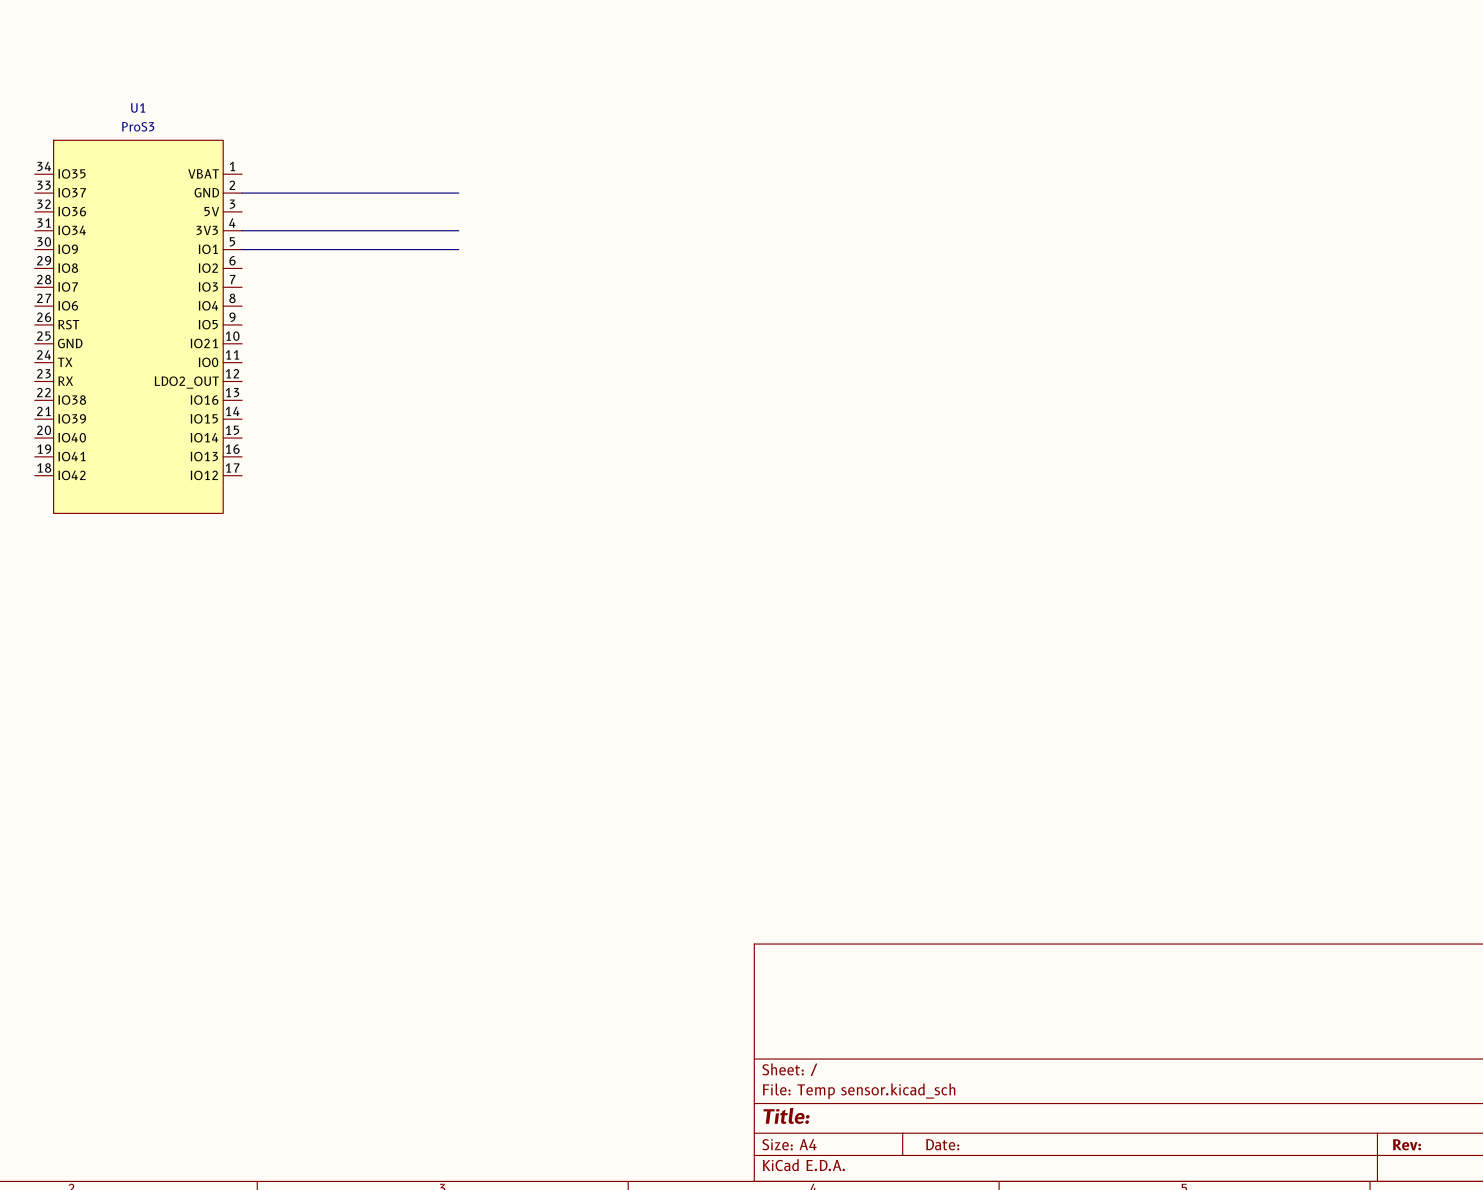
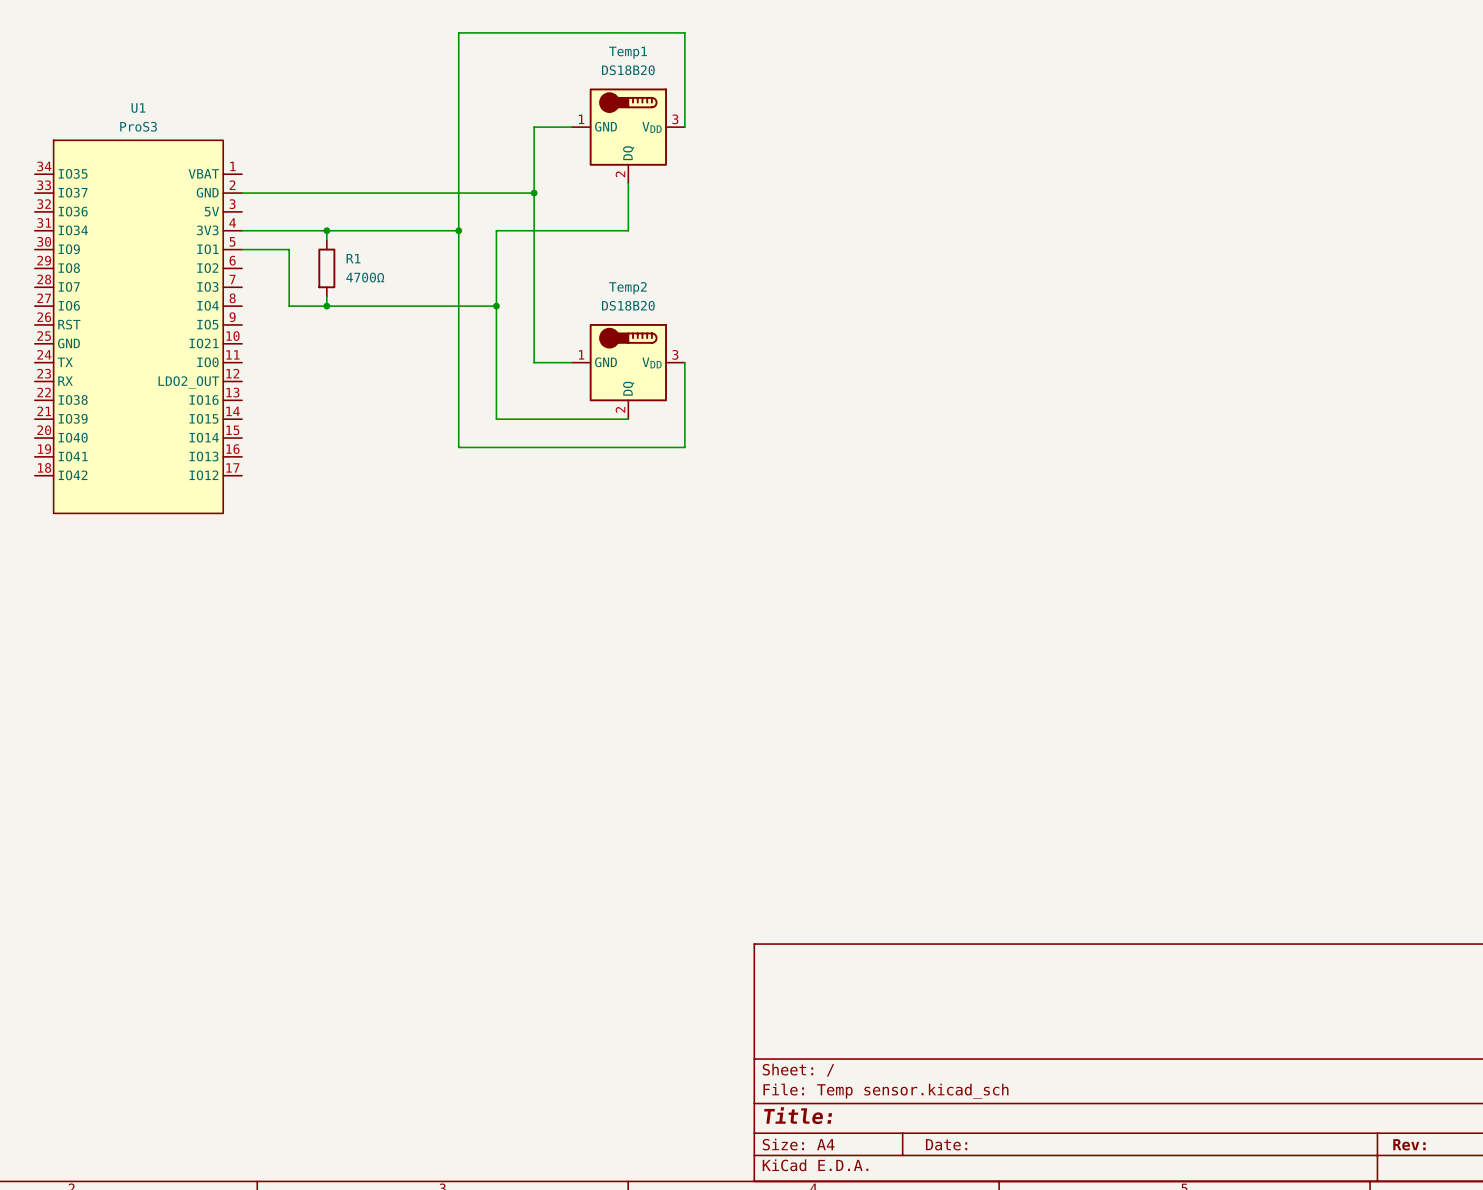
wire: none -> (571, 127) (534, 127) (534, 362) (571, 362)
wire: none -> (684, 127) (684, 32) (458, 32) (458, 447) (684, 447) (684, 362)
Temp1: none -> DS18B20 (628, 136)
wire: none -> (628, 183) (628, 230) (496, 230) (496, 419) (628, 419)
wire: none -> (458, 193) (534, 193)
junction: none -> (534, 193)
wire: none -> (326, 230) (326, 240)
junction: none -> (326, 230)
junction: none -> (458, 230)
wire: (289, 249) (458, 249) -> (289, 249) (289, 306) (496, 306)
R1: none -> 4700Ω (326, 268)
wire: none -> (326, 296) (326, 306)
junction: none -> (326, 306)
junction: none -> (496, 306)
Temp2: none -> DS18B20 (628, 371)

